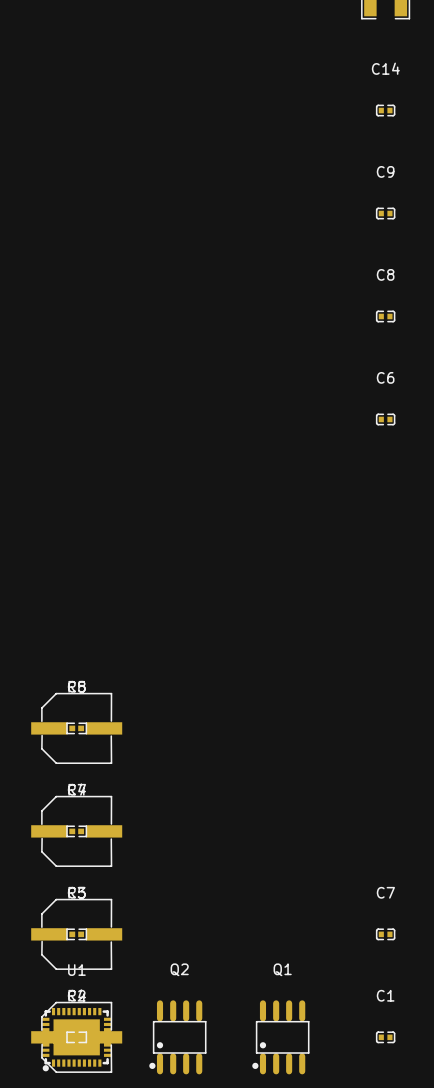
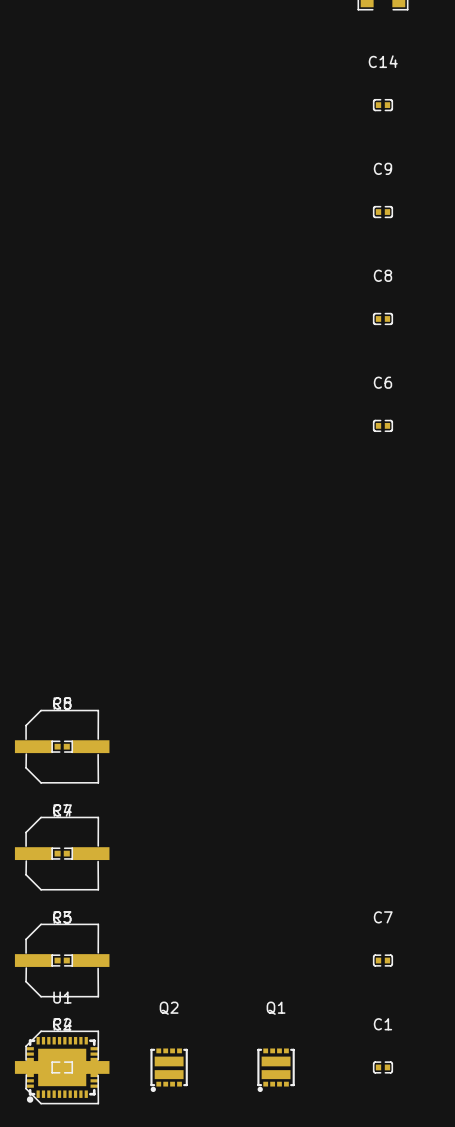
Q2 footprint: [149, 1000, 207, 1075] -> [150, 1048, 188, 1093]
Q1 footprint: [252, 1000, 310, 1075] -> [257, 1048, 295, 1093]

